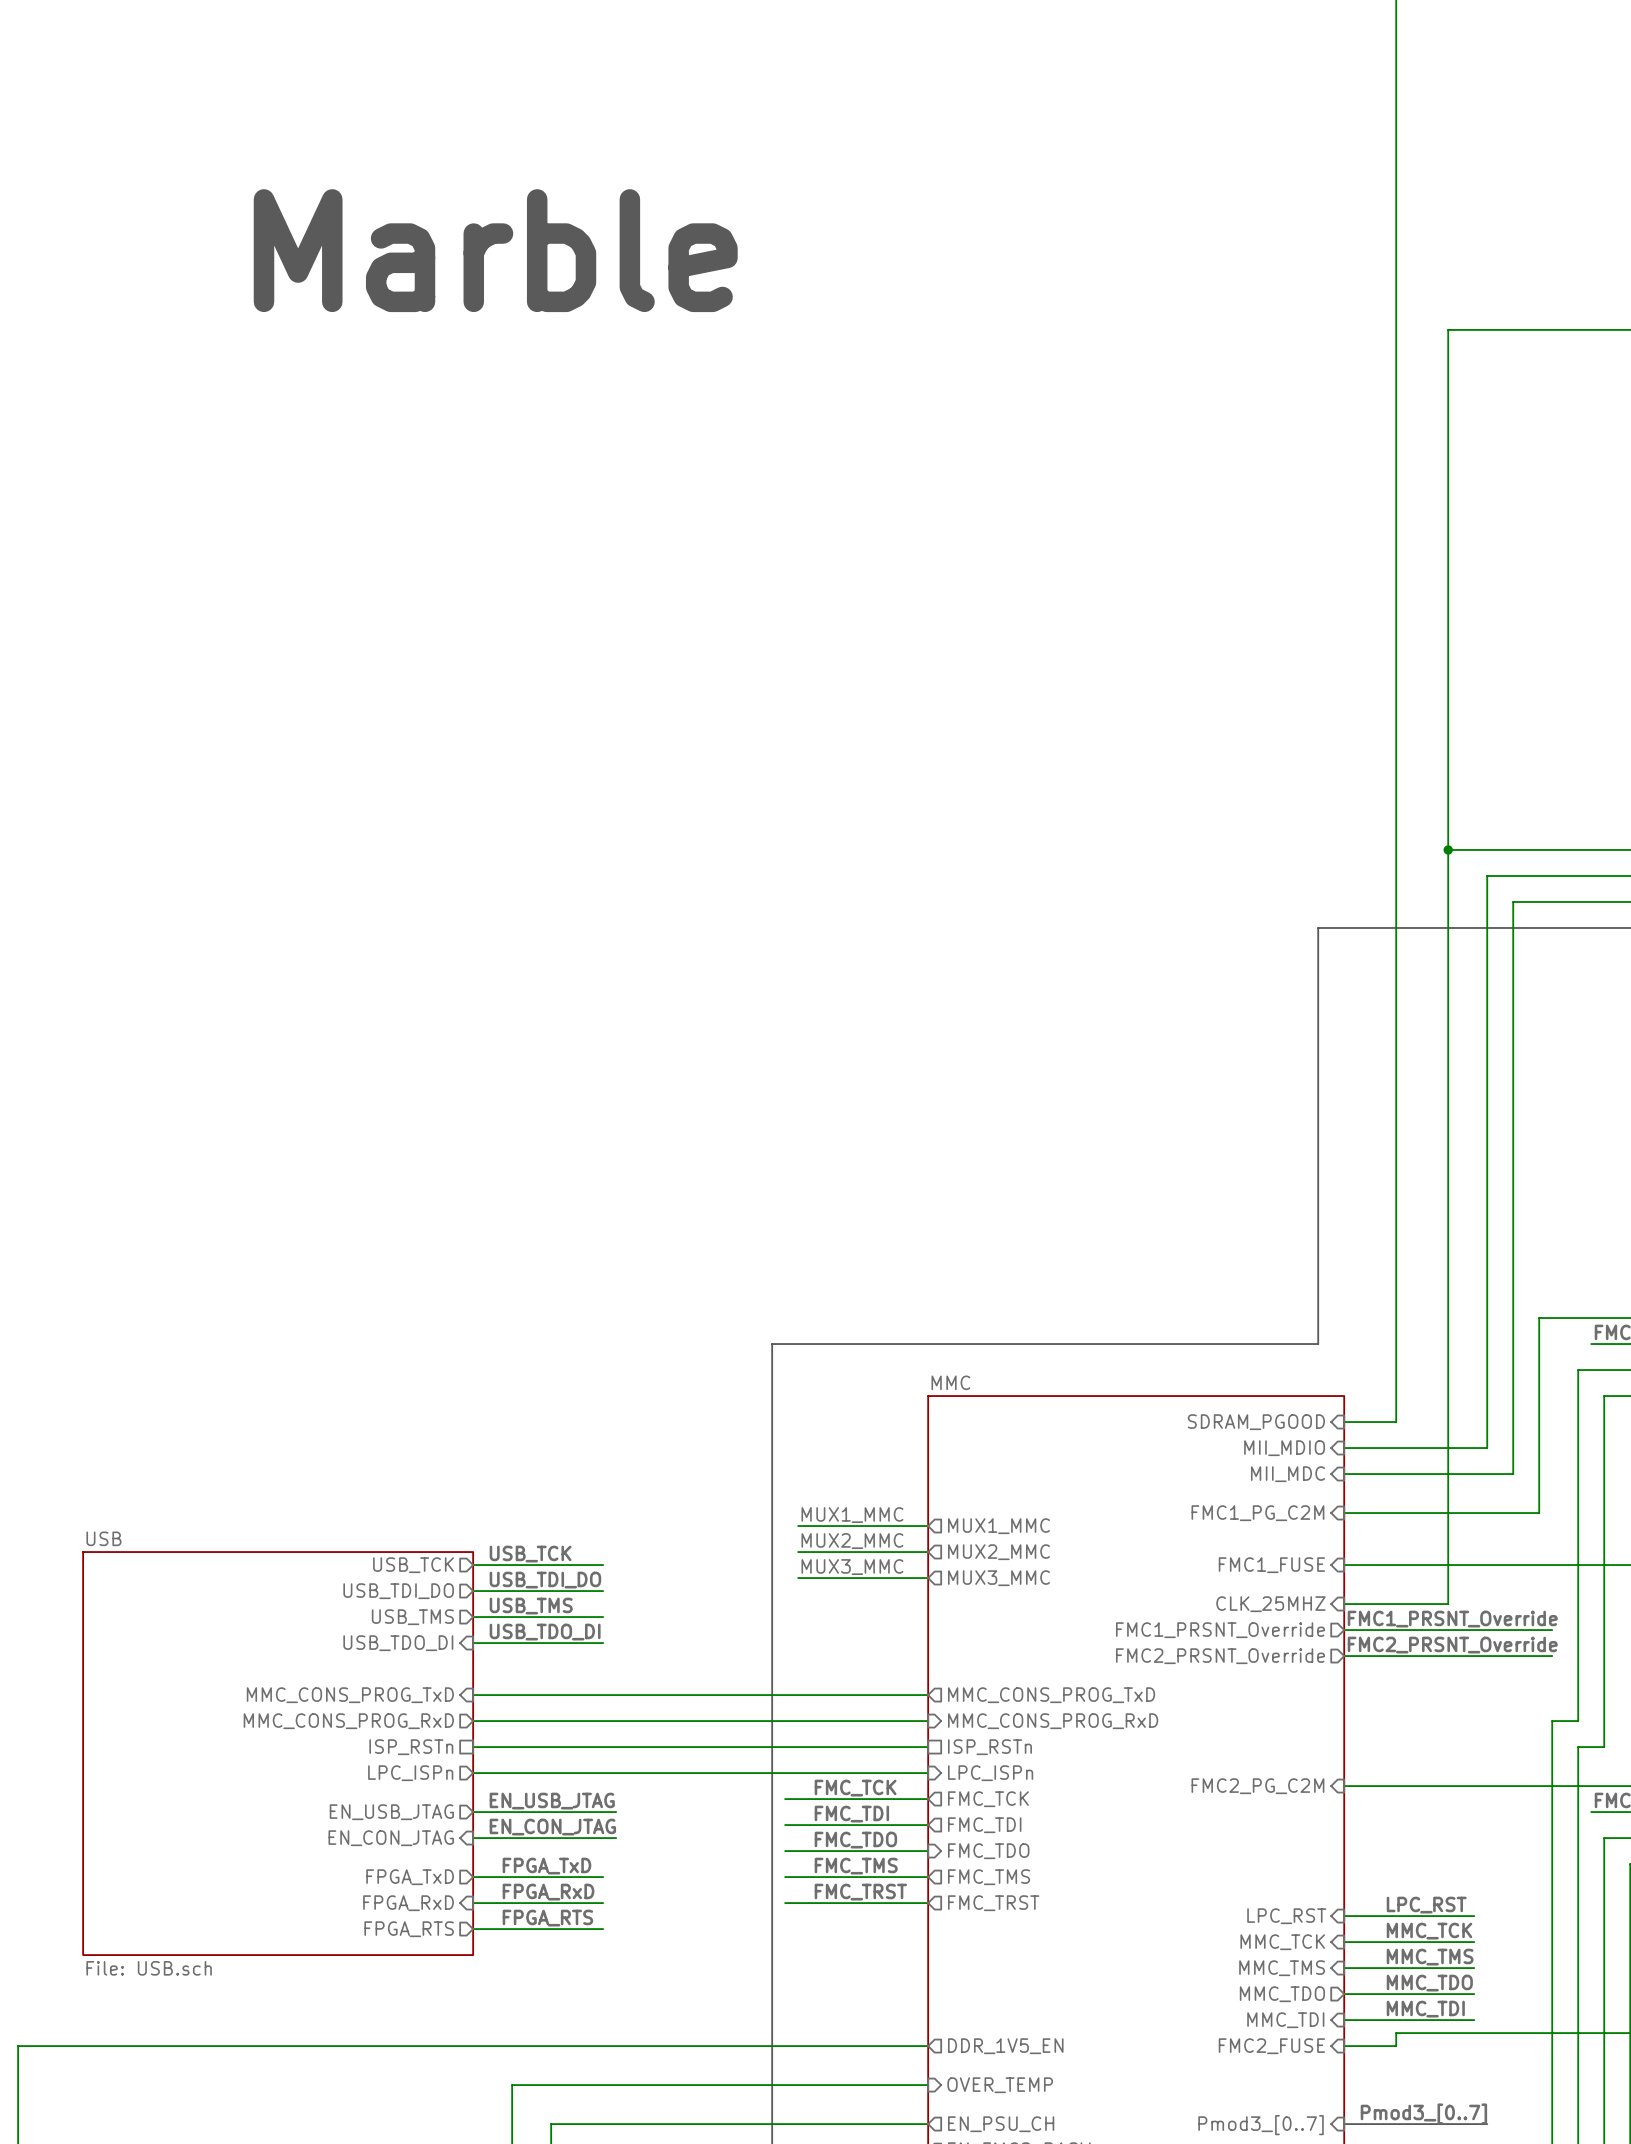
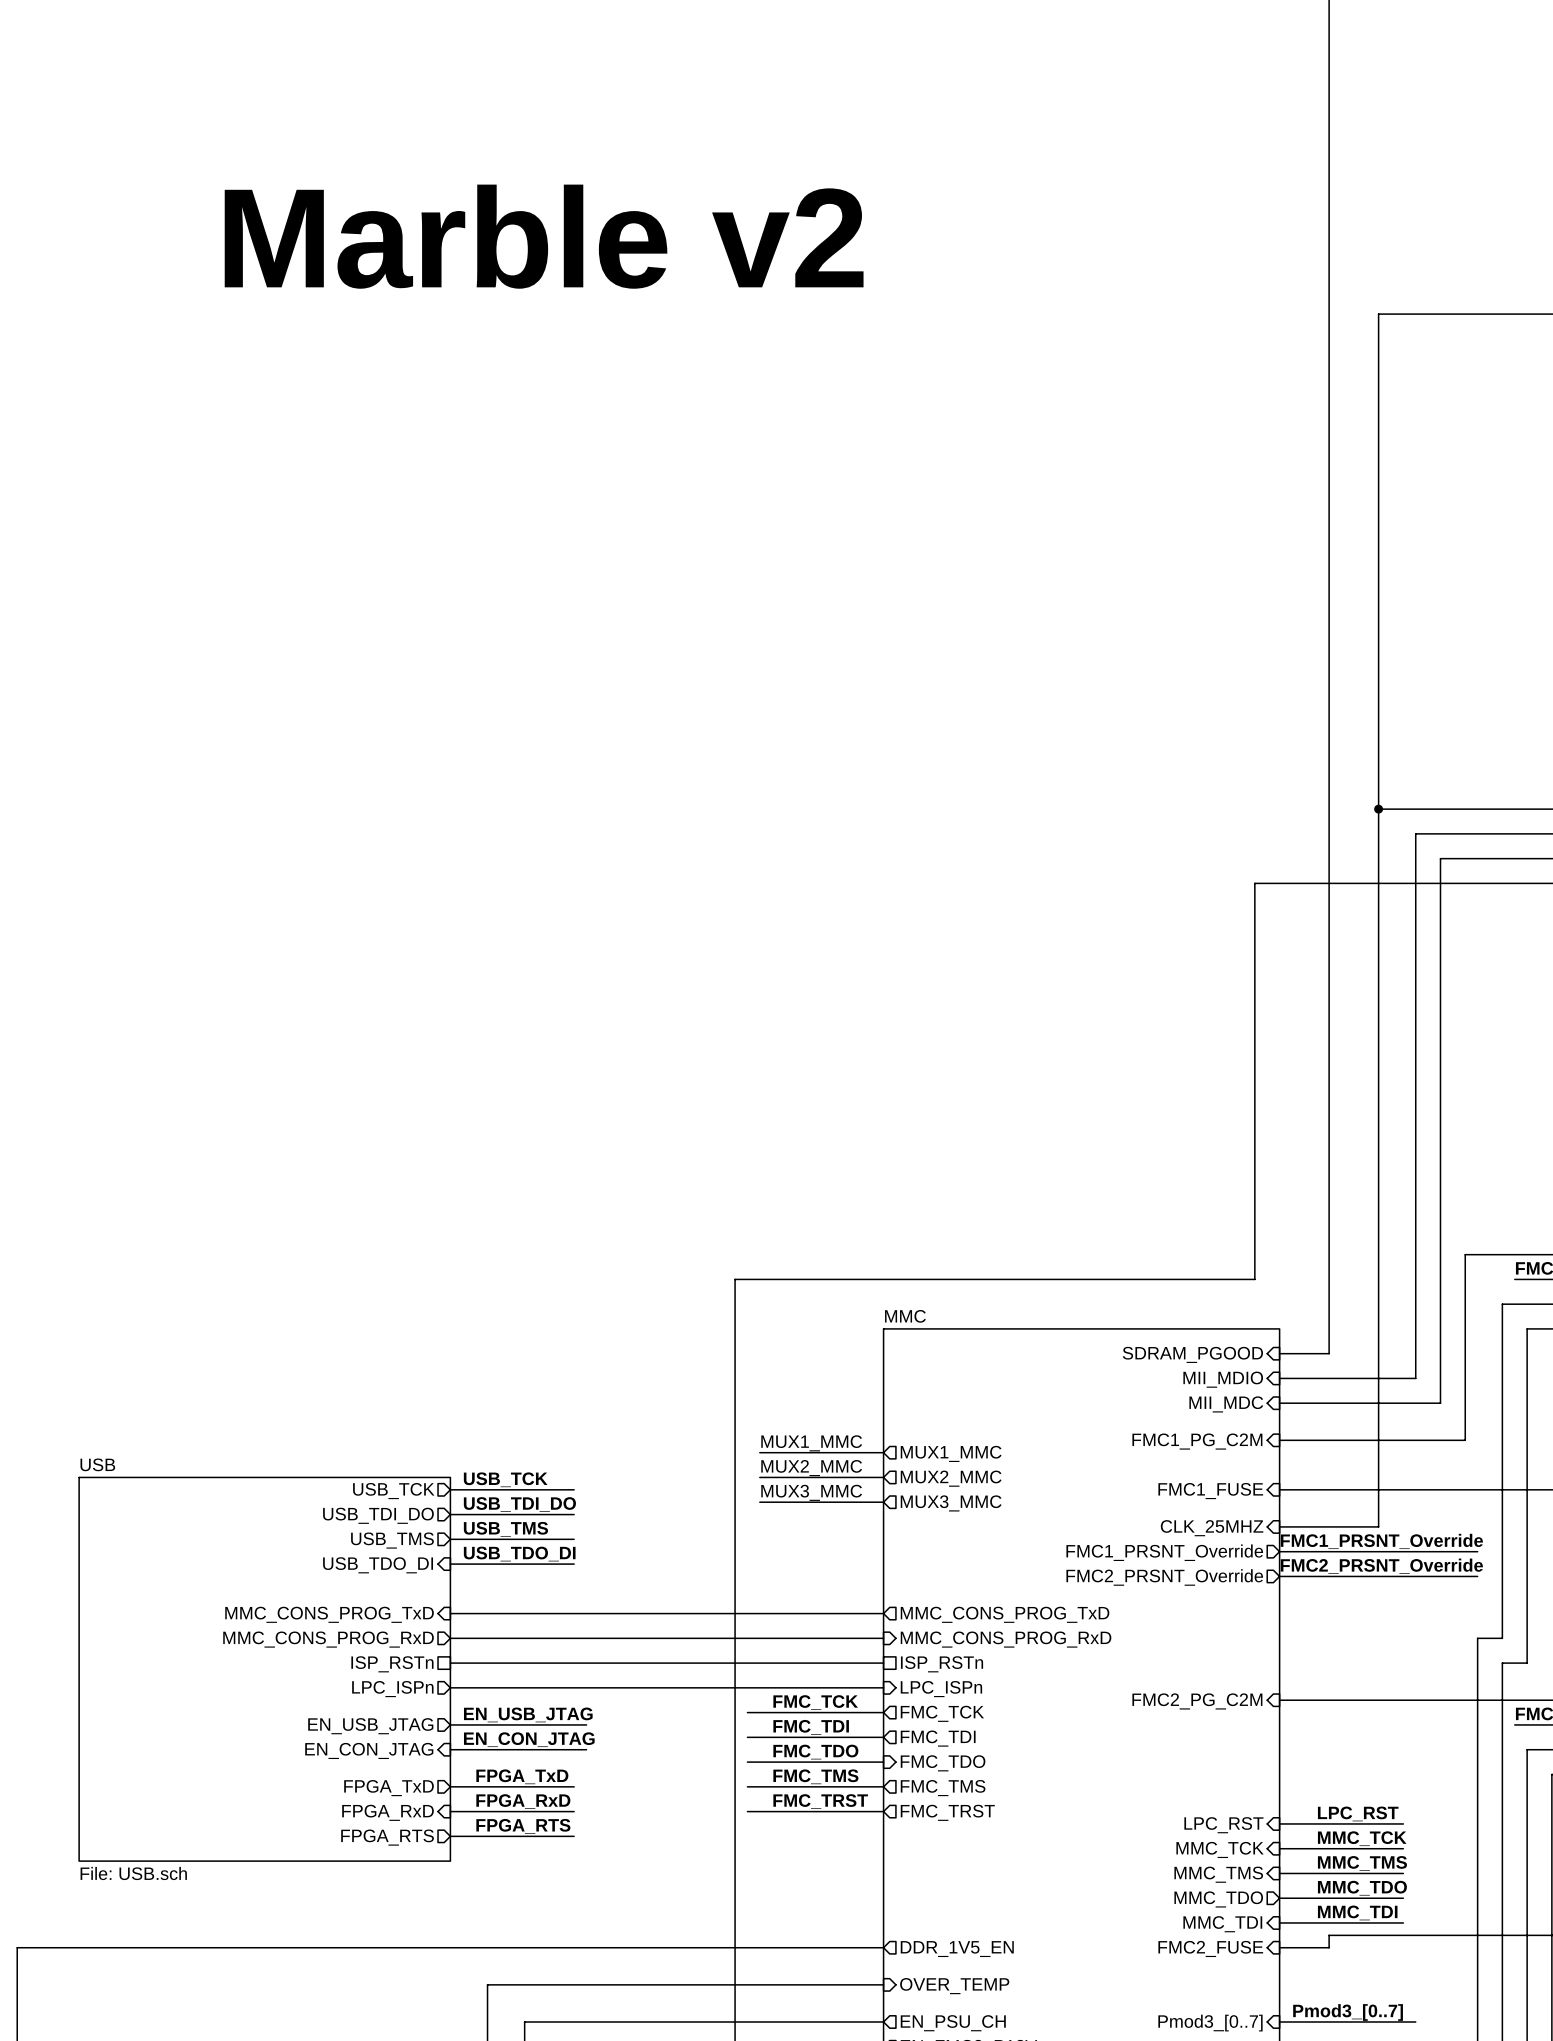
text: Marble (495, 250) -> Marble v2 (544, 236)

